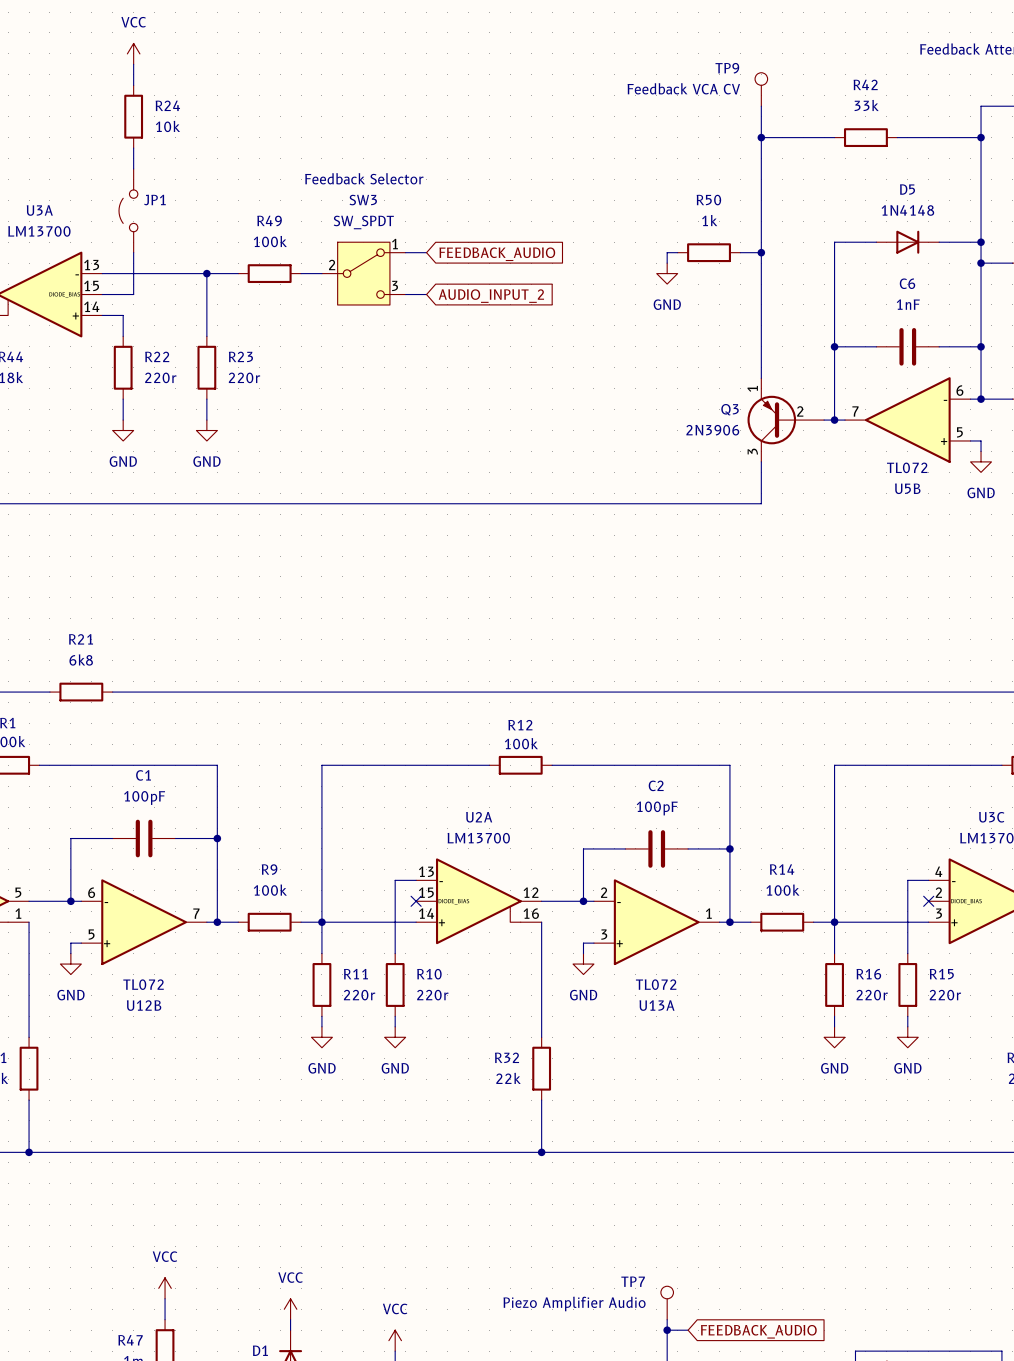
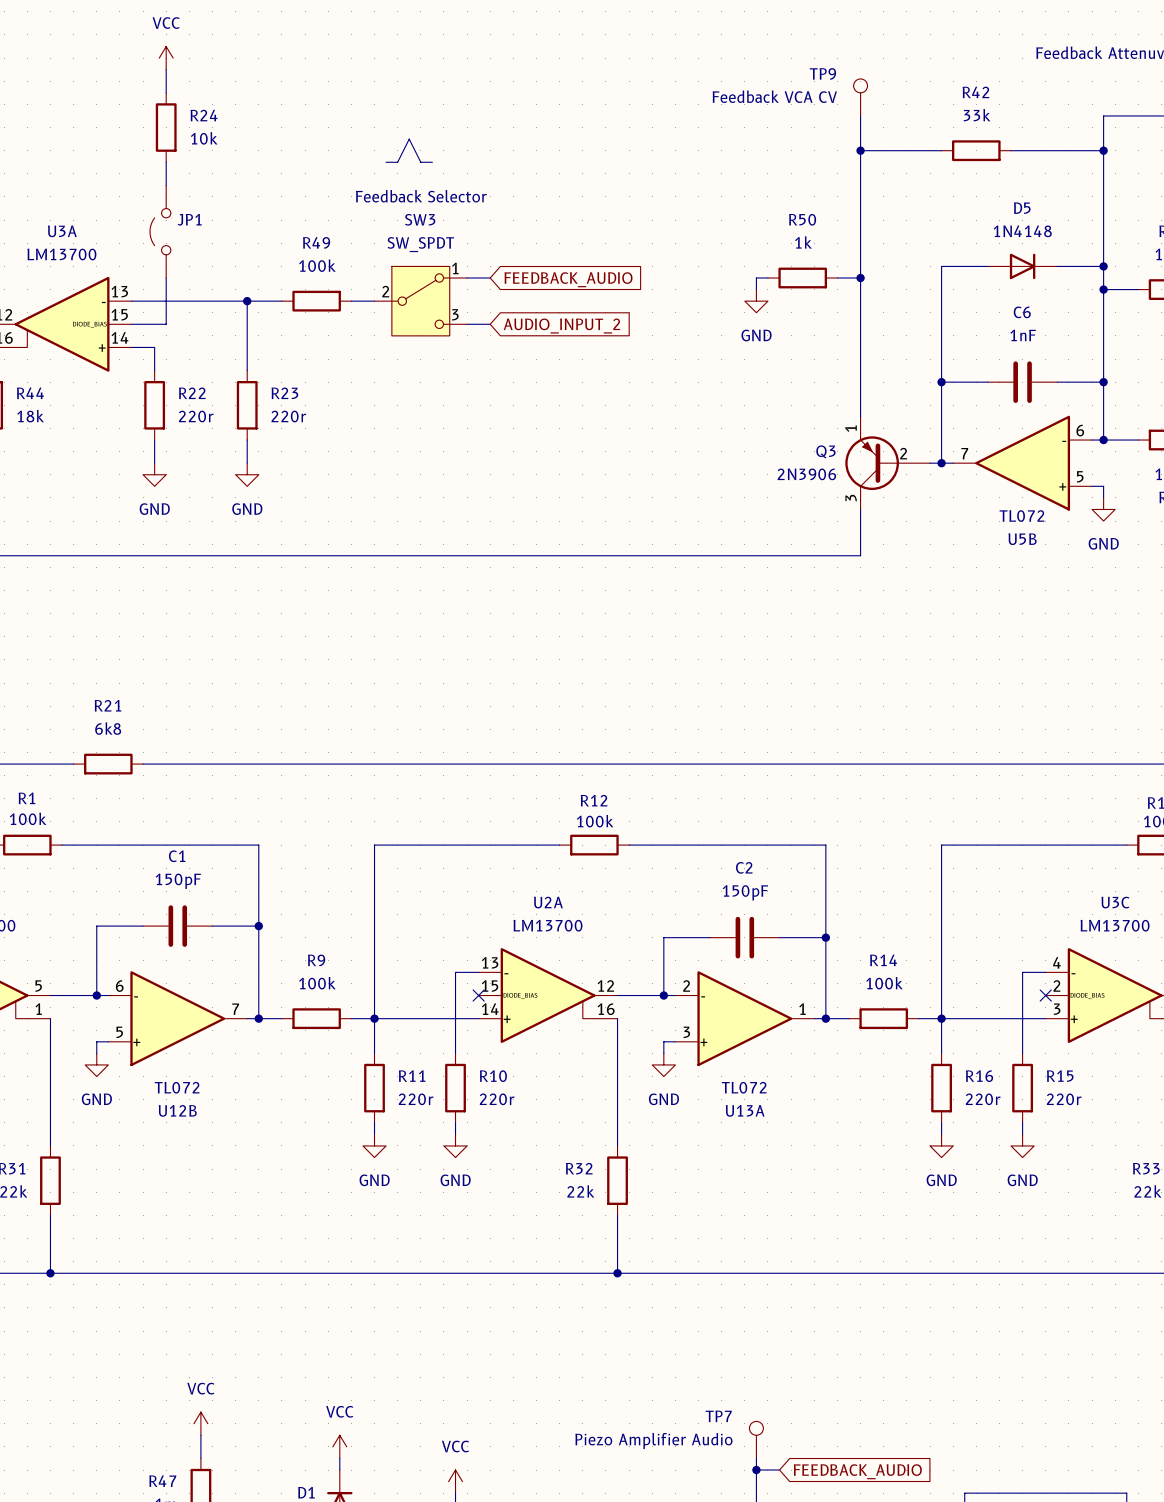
line: none -> (386, 162) (397, 162) (409, 139) (420, 162) (432, 162)
C1 value: 100pF (144, 798) -> 150pF (178, 881)
C2 value: 100pF (657, 808) -> 150pF (745, 892)

